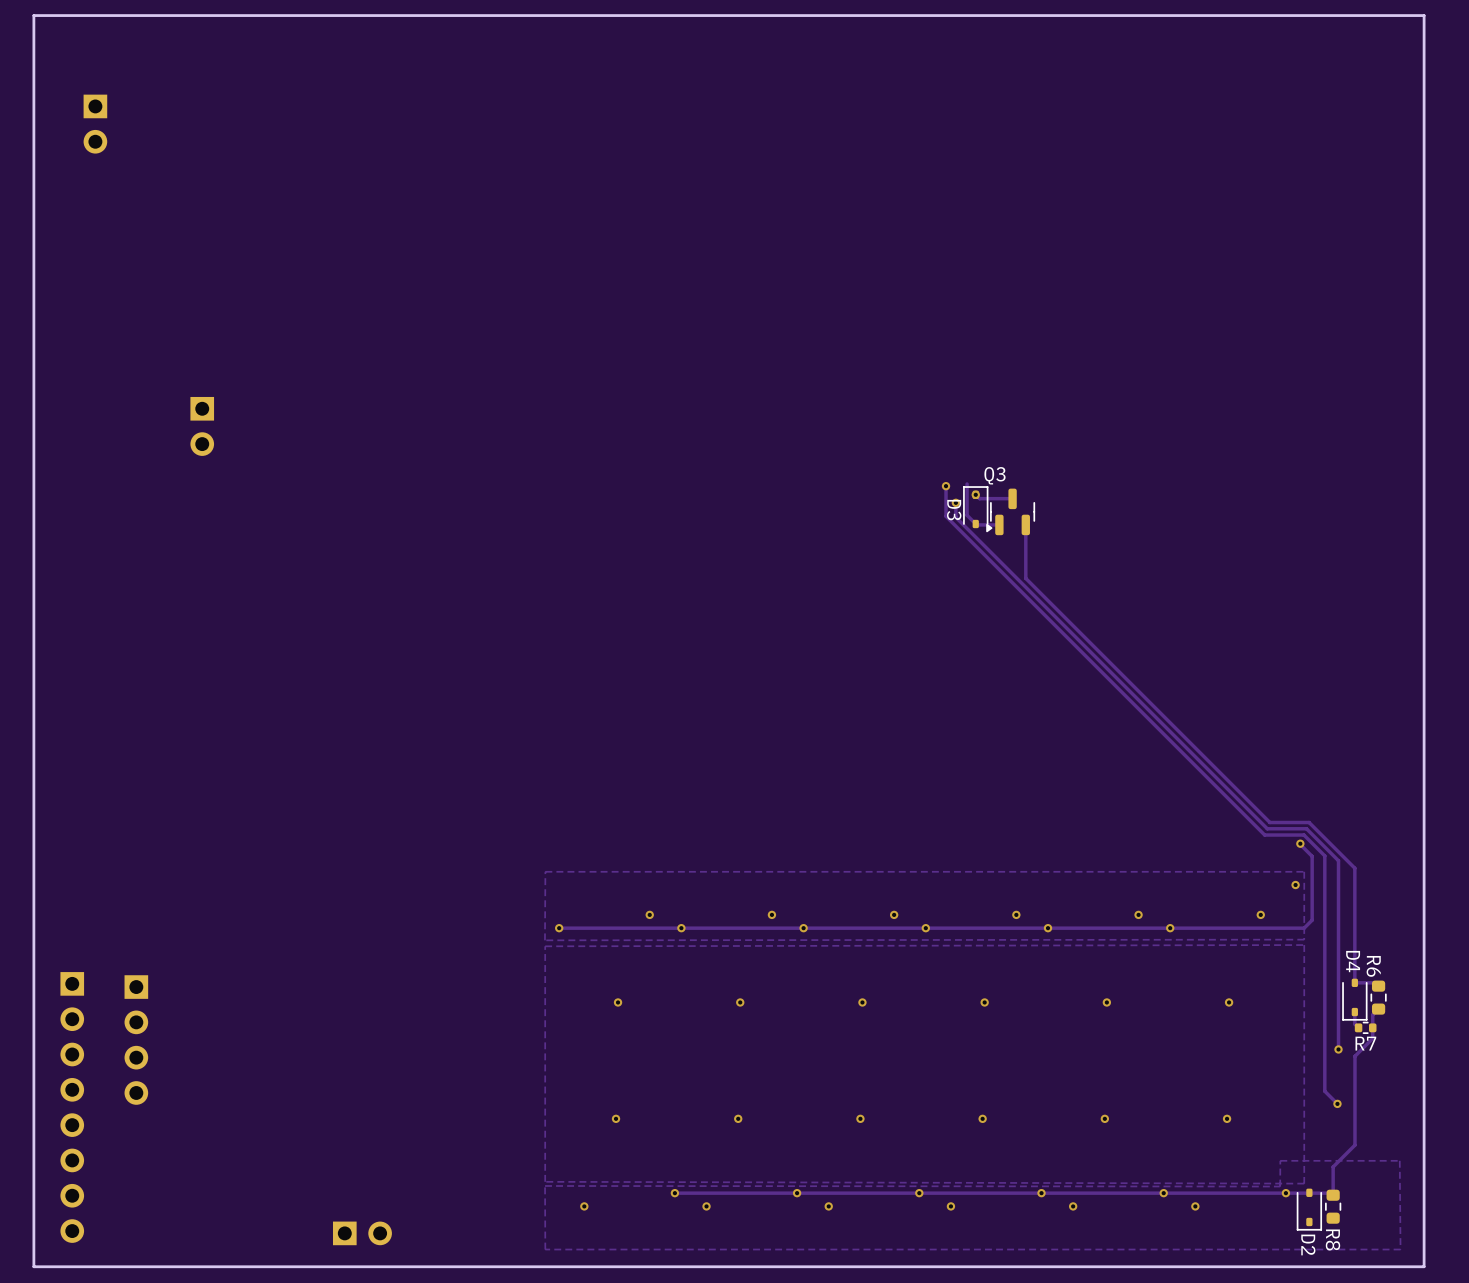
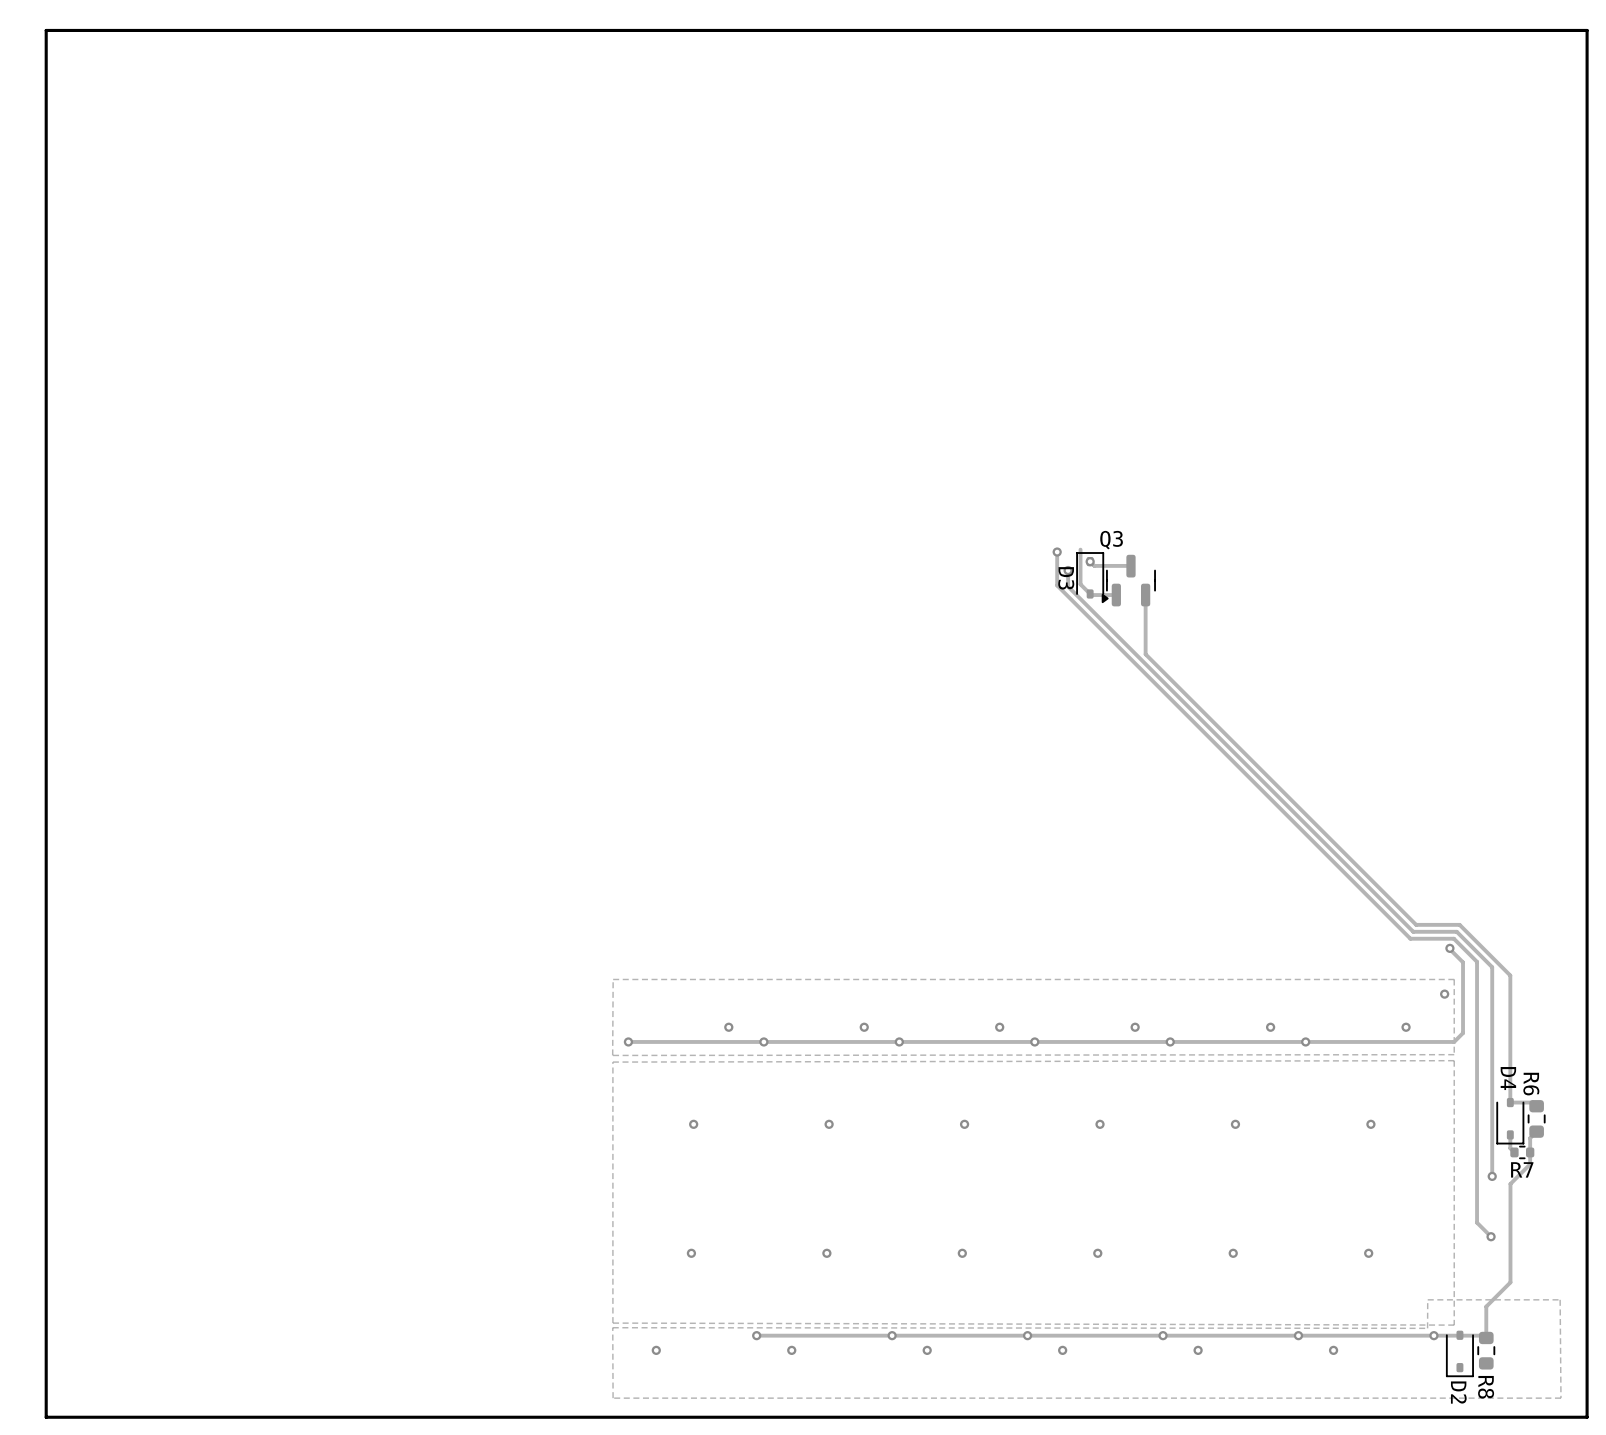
part: (95, 124) -> none
part: (202, 426) -> none
part: (136, 1040) -> none
part: (72, 1107) -> none
part: (362, 1233) -> none

